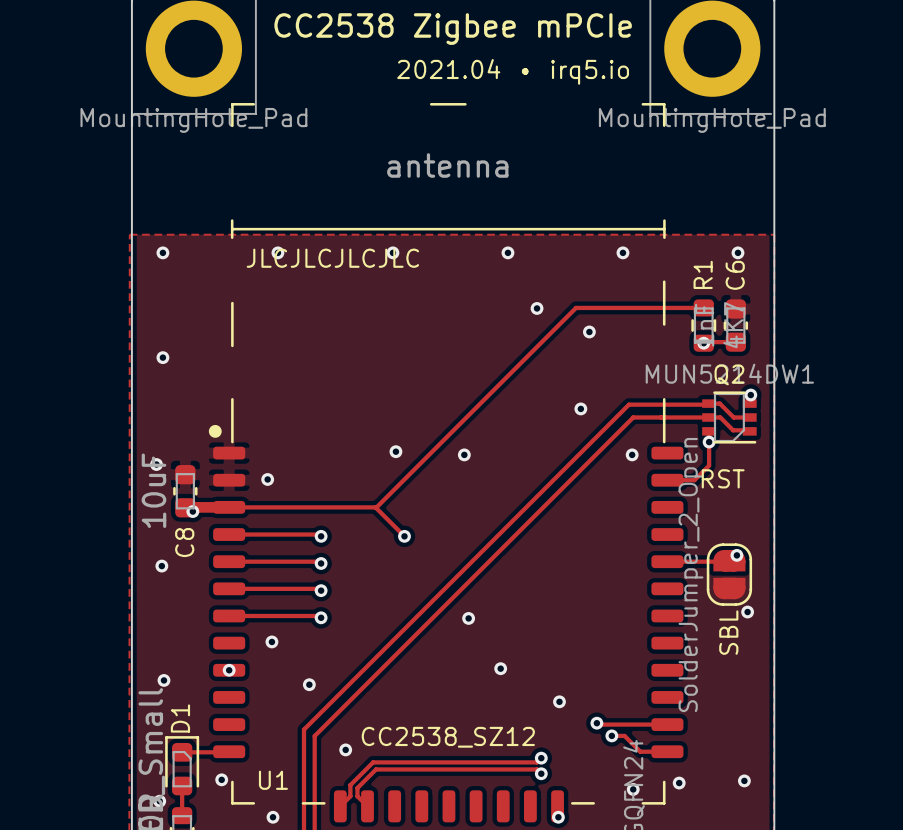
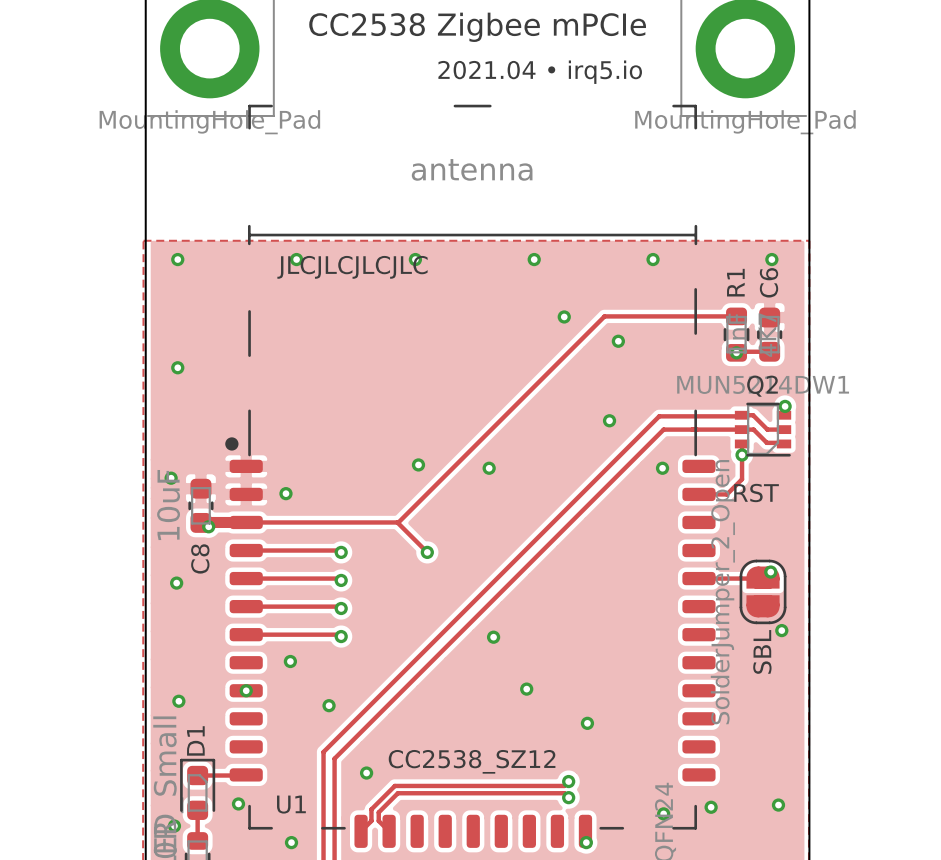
track: (596, 723) (667, 724) -> none
via: (596, 723) -> none
track: (611, 735) (624, 735) (640, 751) (667, 751) -> none
via: (611, 735) -> none

